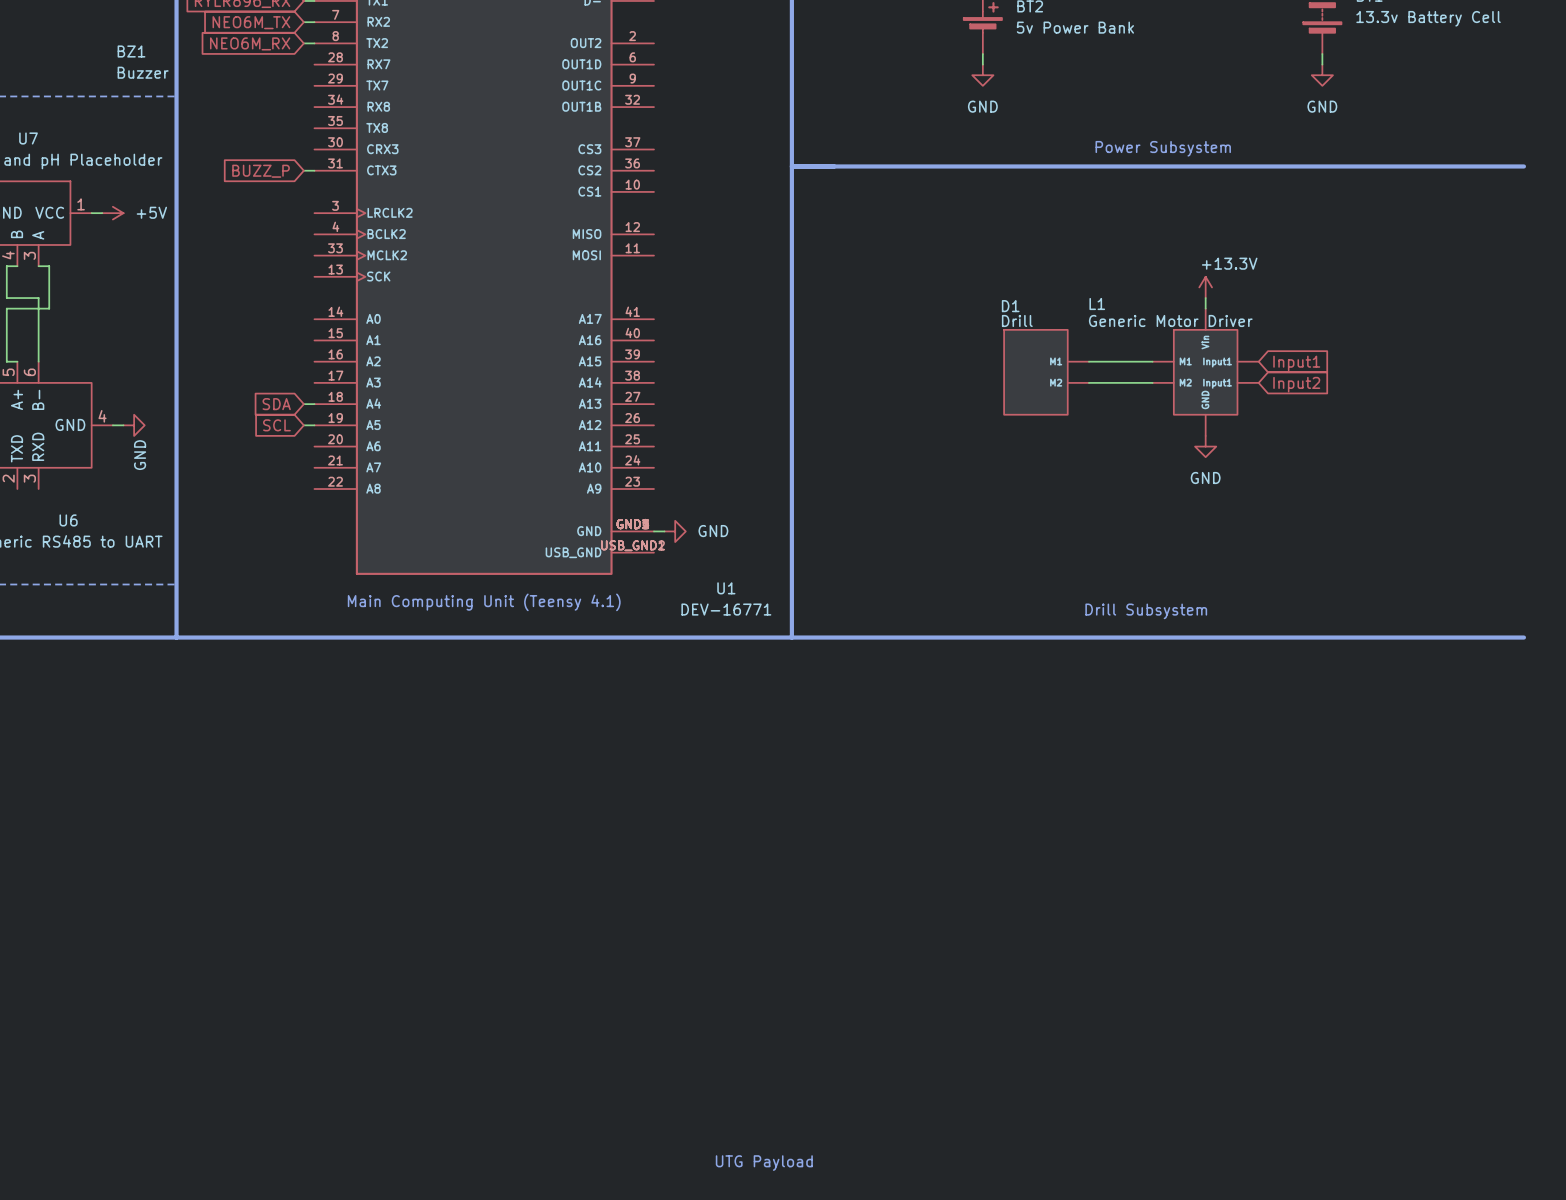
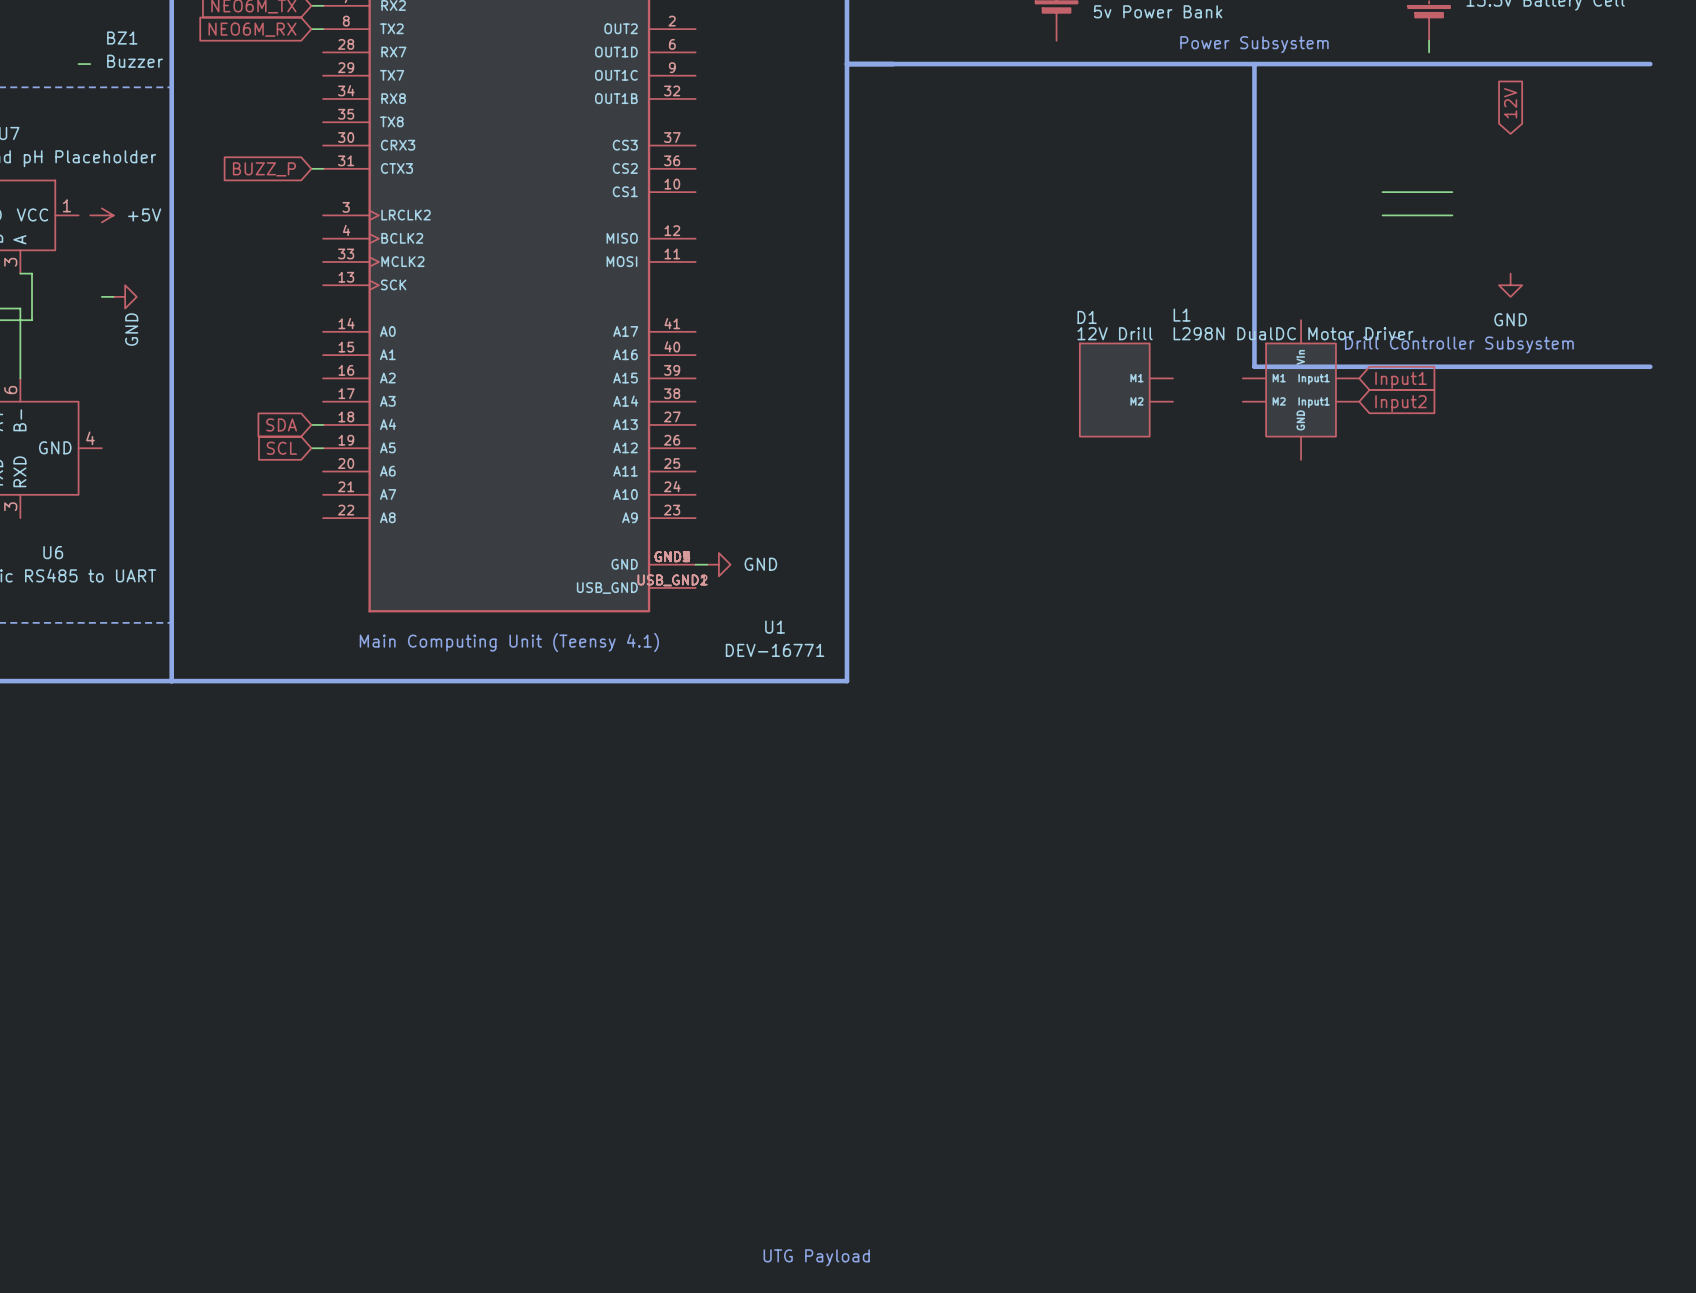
wire: (982, 54) (982, 64) -> none
power symbol: GND (982, 75) -> none
line: none -> (1254, 64) (1254, 366) (1650, 366)
power symbol: GND (1322, 75) -> none
global label: none -> 12V (1510, 103)
text position: Power Subsystem (1163, 148) -> Power Subsystem (1254, 44)
line: (791, 166) (1523, 166) -> (846, 64) (1650, 64)
wire: none -> (1382, 192) (1452, 192)
wire: (91, 213) (102, 213) -> (78, 64) (90, 64)
wire: none -> (1382, 215) (1452, 215)
power symbol: none -> GND (1510, 285)
power symbol: none -> GND (125, 296)
power symbol: +13.3V (1205, 287) -> none
wire: (1205, 298) (1205, 308) -> none
D1 value: Drill (1017, 320) -> 12V Drill (1115, 333)
L1 value: Generic Motor Driver (1170, 320) -> L298N DualDC Motor Driver (1293, 333)
text: none -> Drill Controller Subsystem (1459, 345)
wire: (1088, 361) (1152, 361) -> none
wire: (1088, 382) (1152, 382) -> none
wire: (112, 425) (123, 425) -> (101, 296) (113, 296)
power symbol: GND (134, 425) -> none
power symbol: GND (1205, 446) -> none
text: Drill Subsystem (1146, 611) -> none
line: (791, 637) (1523, 637) -> none

